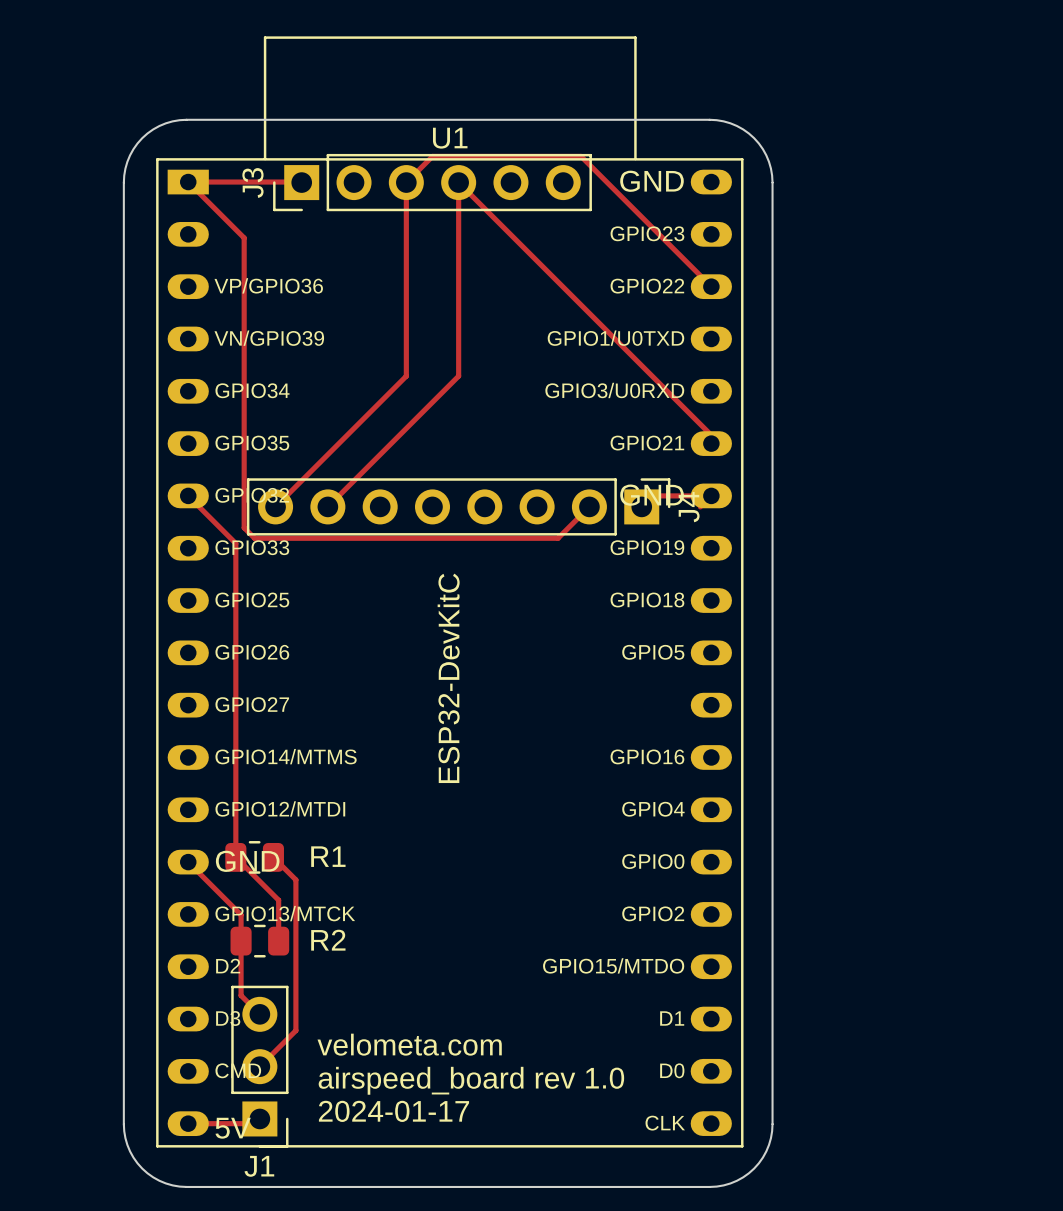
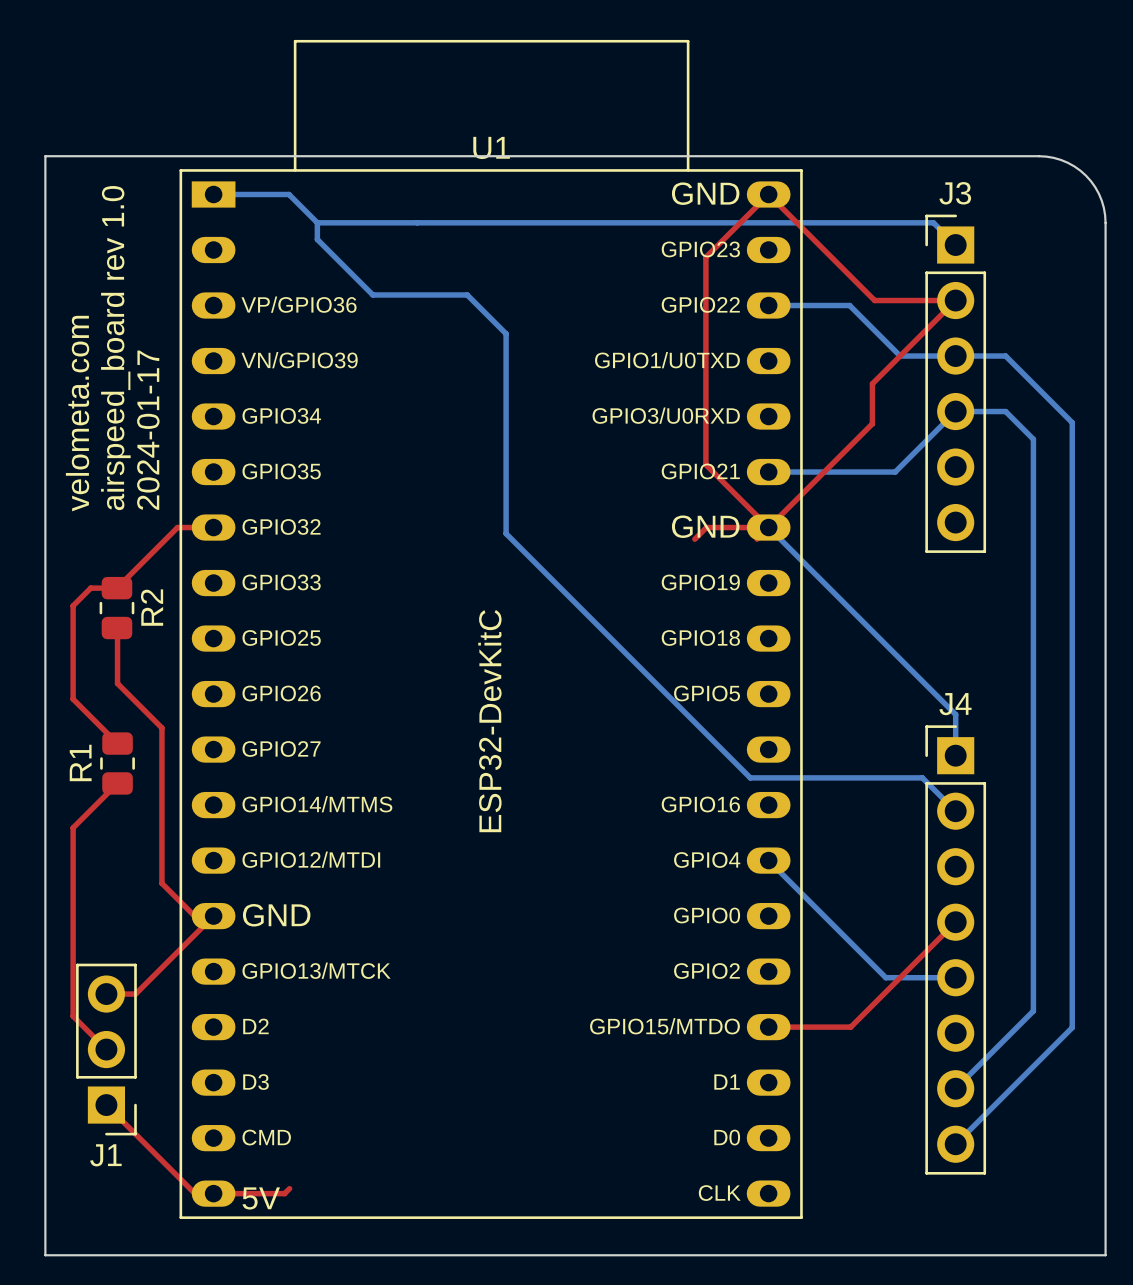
board edge: (186, 119) (716, 120) (730, 123) (748, 133) (758, 143) (766, 155) (770, 168) (772, 182) (772, 1124) (770, 1138) (762, 1157) (754, 1168) (737, 1180) (723, 1185) (709, 1186) (186, 1186) (165, 1183) (153, 1177) (137, 1163) (130, 1151) (125, 1138) (123, 1124) (123, 182) (125, 168) (130, 155) (142, 138) (153, 129) (165, 123) (186, 119) -> (45, 156) (45, 1255) (1105, 1255) (1105, 222) (1101, 200) (1095, 187) (1086, 175) (1074, 166) (1060, 159) (1038, 156) (45, 156)
bottom track: none -> (213, 194) (289, 194) (317, 222)
top track: (301, 182) (188, 182) (244, 237) (244, 527) (254, 538) (558, 538) (589, 506) -> none
J3 rotation: 0° (432, 182) -> 90° clockwise (955, 383)
J3 position: (432, 182) -> (955, 383)
top track: none -> (768, 194) (874, 300) (955, 300) (872, 383) (872, 423) (768, 527) (705, 464) (705, 257) (768, 194)
bottom track: none -> (317, 222) (933, 222) (955, 245)
bottom track: none -> (317, 222) (317, 239) (372, 294) (467, 294) (506, 333) (506, 533) (750, 777) (922, 777) (955, 811)
top track: (711, 286) (581, 156) (432, 156) (406, 182) (406, 376) (275, 506) -> none
bottom track: none -> (768, 305) (849, 305) (900, 356) (1005, 356) (1072, 422) (1072, 1027) (955, 1144)
text: none -> airspeed_board rev 1.0 (115, 348)
text: none -> velometa.com (77, 413)
text: none -> 2024-01-17 (148, 430)
top track: (711, 443) (711, 435) (458, 182) (458, 376) (327, 506) -> none
bottom track: none -> (768, 472) (895, 472) (955, 411) (1005, 411) (1033, 439) (1033, 1011) (955, 1088)
top track: (188, 495) (235, 543) (235, 857) (278, 900) (278, 941) -> (213, 527) (177, 527) (116, 588) (90, 588) (73, 605) (73, 699) (117, 743)
bottom track: none -> (768, 527) (955, 714) (955, 755)
J4 rotation: 0° (458, 506) -> 90° counterclockwise (955, 949)
J4 position: (458, 506) -> (955, 949)
top track: none -> (116, 628) (117, 683) (161, 727) (161, 883) (194, 916)
top track: none -> (117, 783) (73, 827) (73, 1016) (106, 1049)
bottom track: none -> (768, 860) (885, 977) (955, 977)
R1 name position: R1 (328, 856) -> R1 (80, 762)
R1 rotation: 0° (254, 857) -> 90° clockwise (117, 763)
R1 position: (254, 857) -> (117, 763)
top track: (273, 857) (295, 879) (295, 1030) (259, 1066) -> none
top track: (188, 862) (241, 914) (241, 995) (259, 1014) -> (213, 916) (135, 994) (106, 994)
top track: none -> (955, 922) (850, 1027) (768, 1027)
R2 rotation: 0° (259, 941) -> 90° clockwise (116, 608)
R2 position: (259, 941) -> (116, 608)
top track: none -> (106, 1105) (195, 1193)
text: velometa.com (409, 1044) -> none
J1 position: (259, 1066) -> (106, 1049)
text: airspeed_board rev 1.0 (471, 1080) -> none
text: 2024-01-17 (393, 1111) -> none

